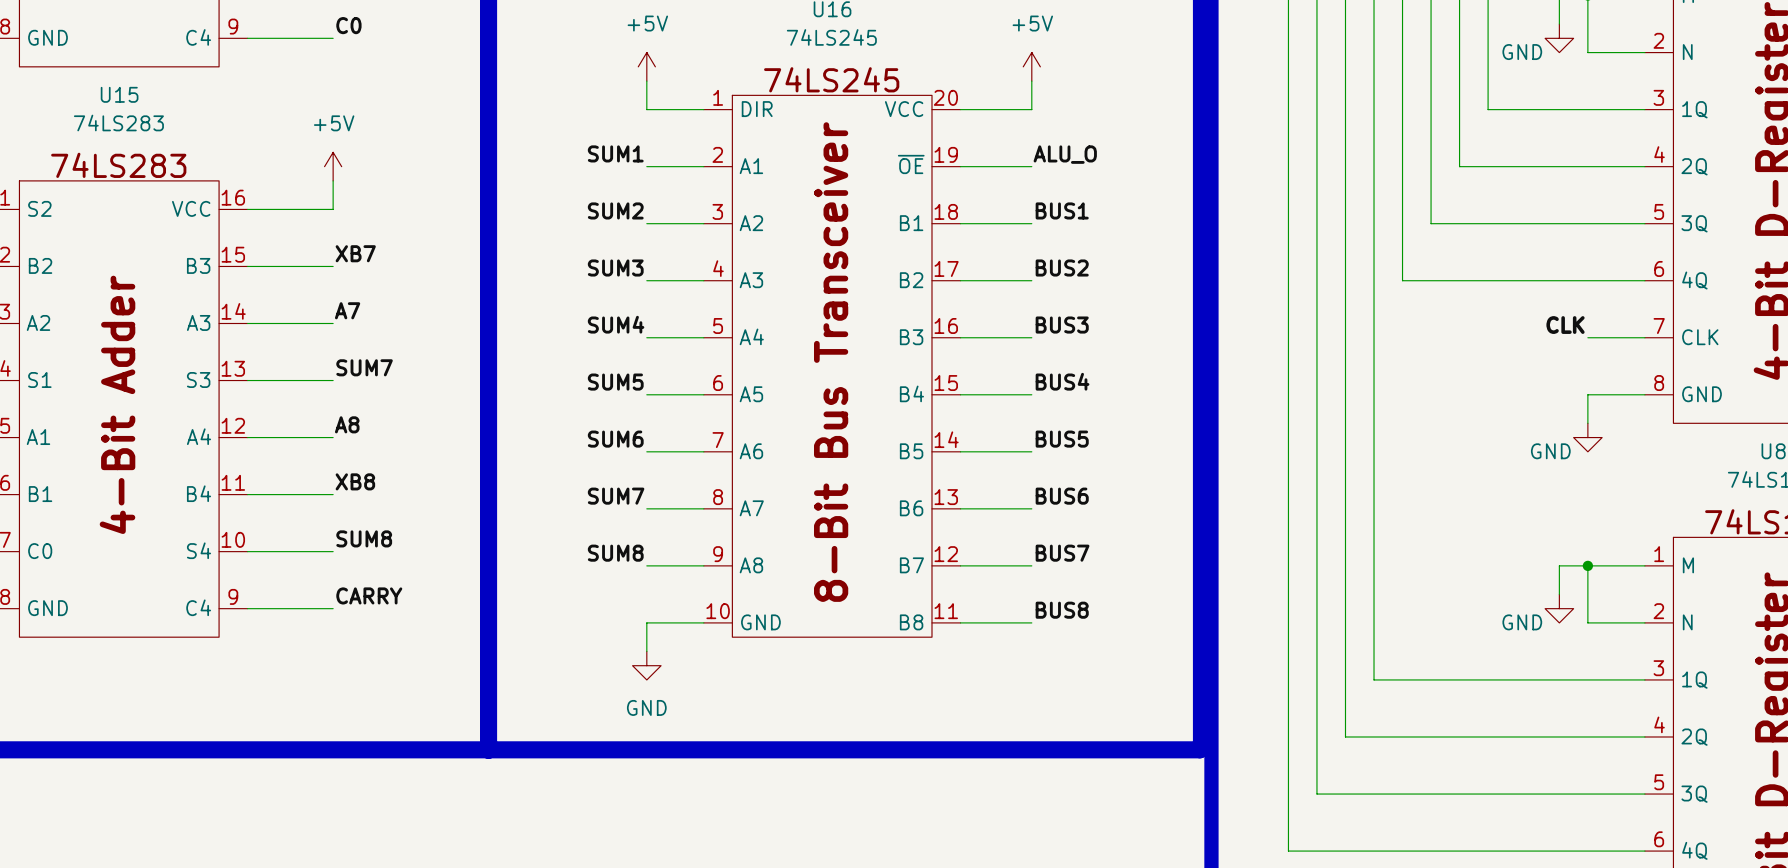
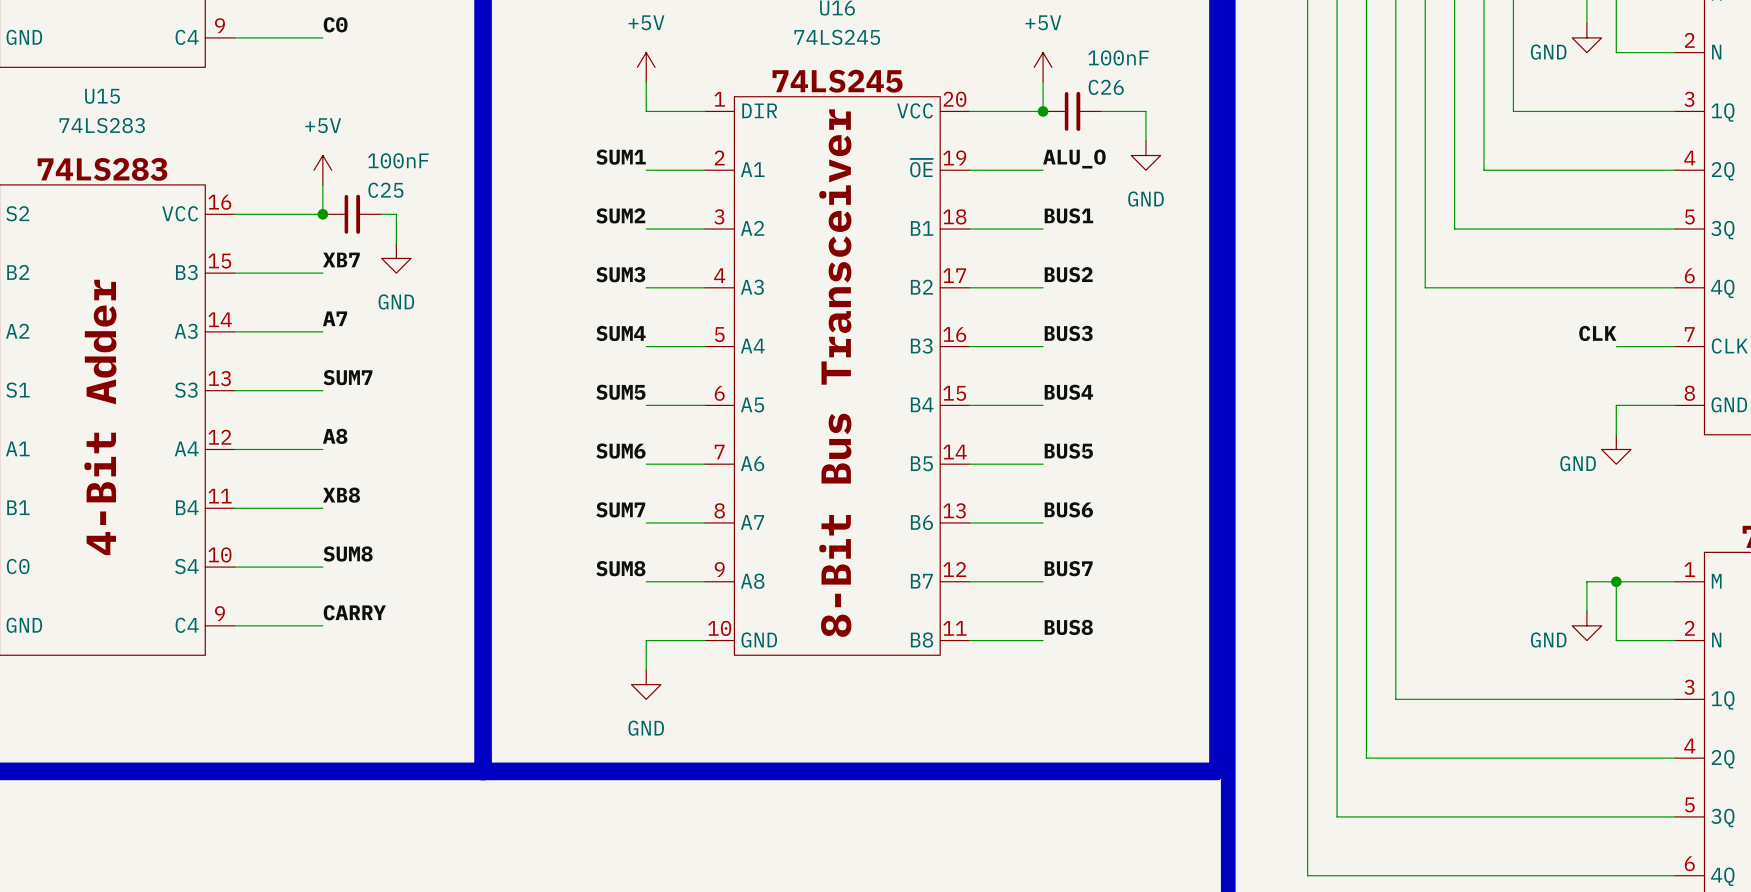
junction: none -> (1043, 111)
C26: none -> 100nF (1072, 111)
wire: none -> (1101, 111) (1145, 111) (1145, 140)
power symbol: none -> GND (1145, 155)
junction: none -> (322, 214)
C25: none -> 100nF (352, 214)
wire: none -> (381, 214) (396, 214) (396, 243)
power symbol: none -> GND (396, 258)

